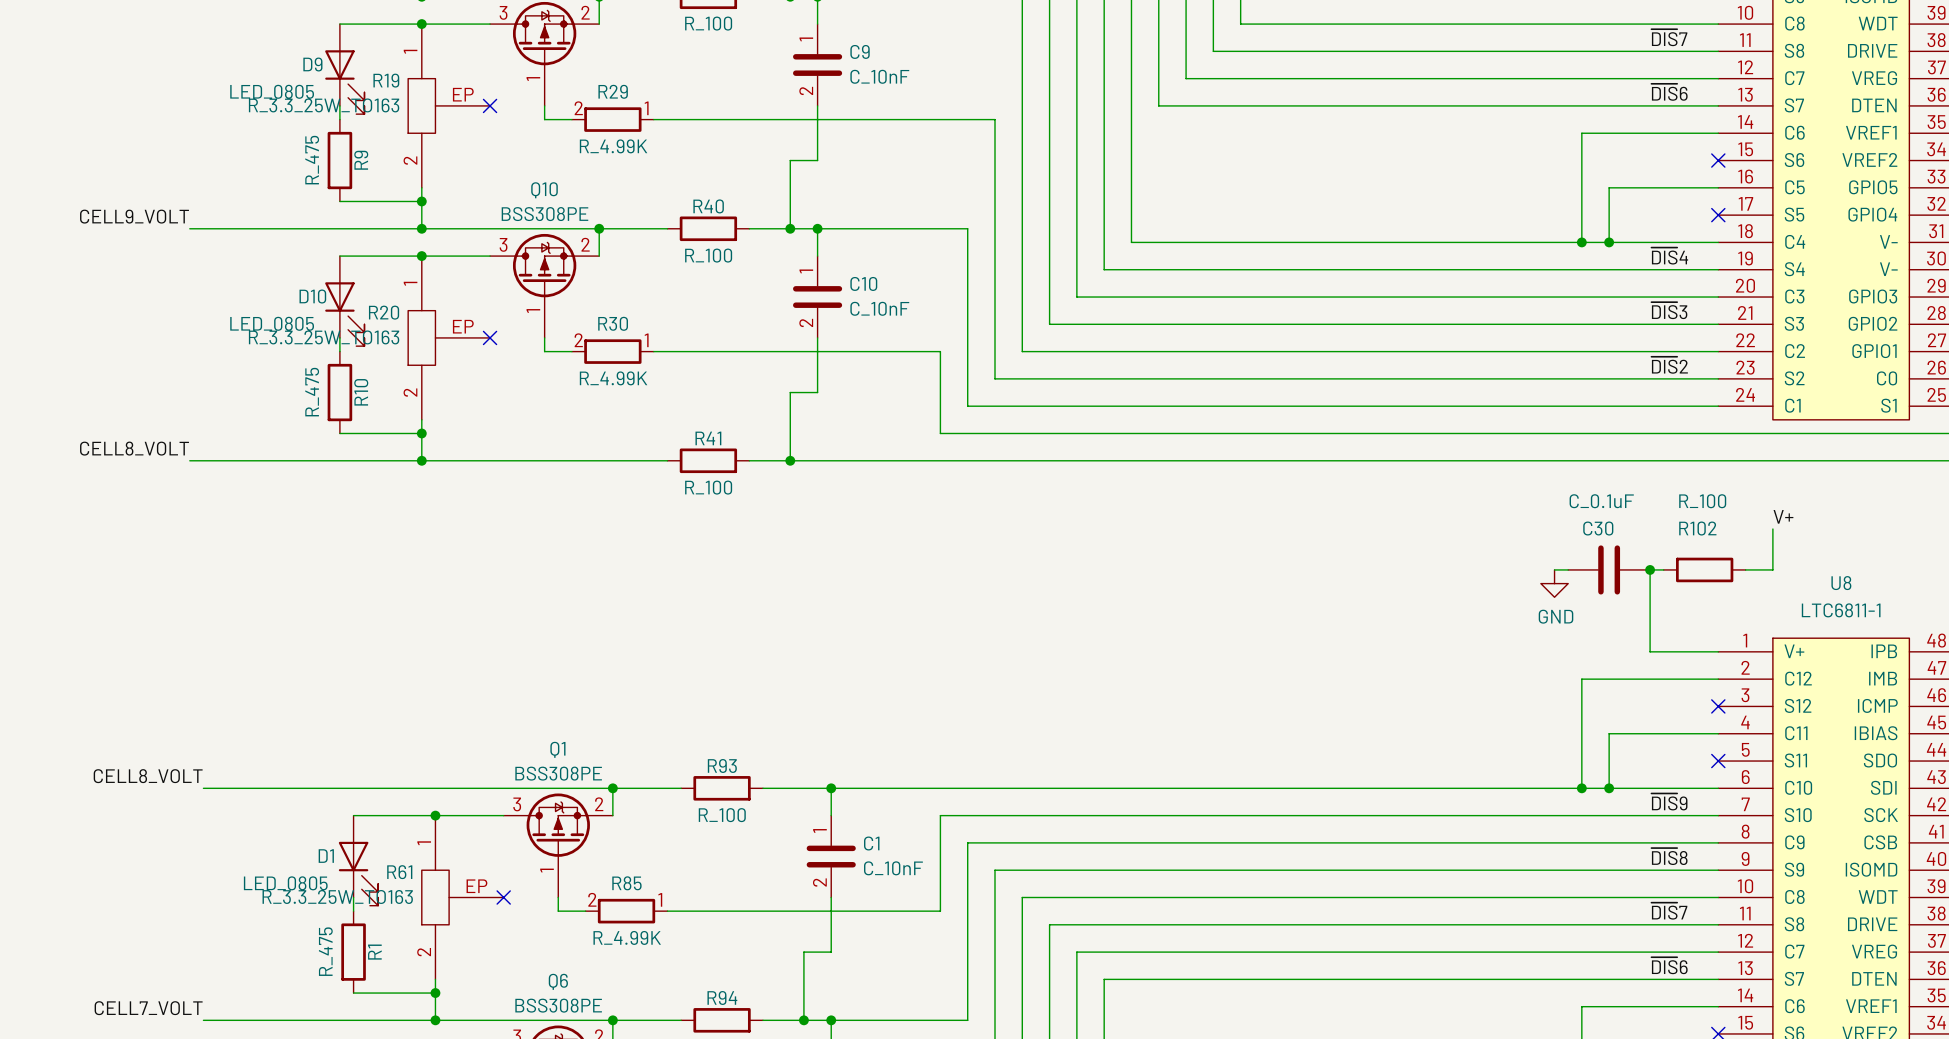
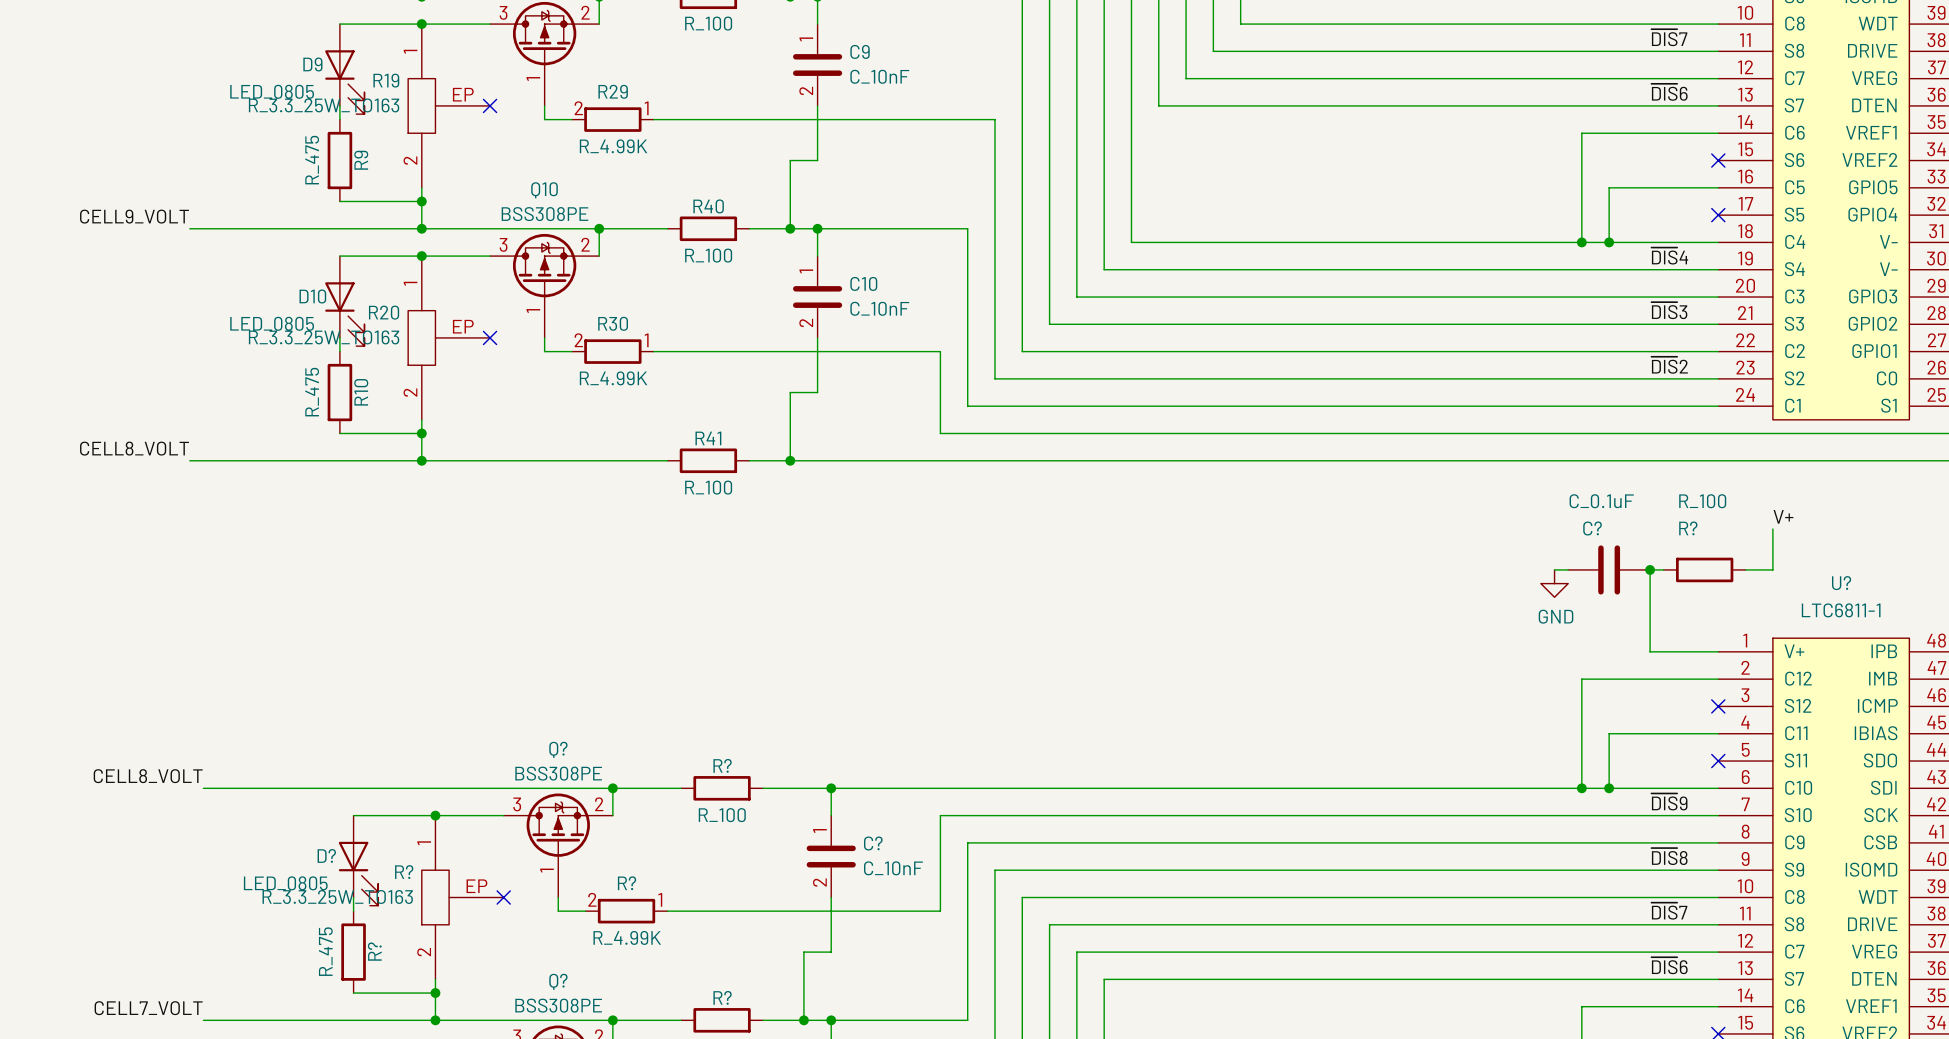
C30 name: C30 (1598, 528) -> C? (1592, 528)
R102 name: R102 (1697, 528) -> R? (1688, 528)
U8 name: U8 (1841, 583) -> U? (1841, 583)
Q1 name: Q1 (557, 749) -> Q? (558, 749)
R93 name: R93 (722, 765) -> R? (722, 765)
C1 name: C1 (871, 843) -> C? (873, 843)
D1 name: D1 (326, 856) -> D? (326, 855)
R61 name: R61 (399, 872) -> R? (404, 872)
R85 name: R85 (626, 883) -> R? (627, 883)
R1 name: R1 (374, 952) -> R? (374, 951)
Q6 name: Q6 (558, 981) -> Q? (558, 981)
R94 name: R94 (722, 997) -> R? (722, 997)

